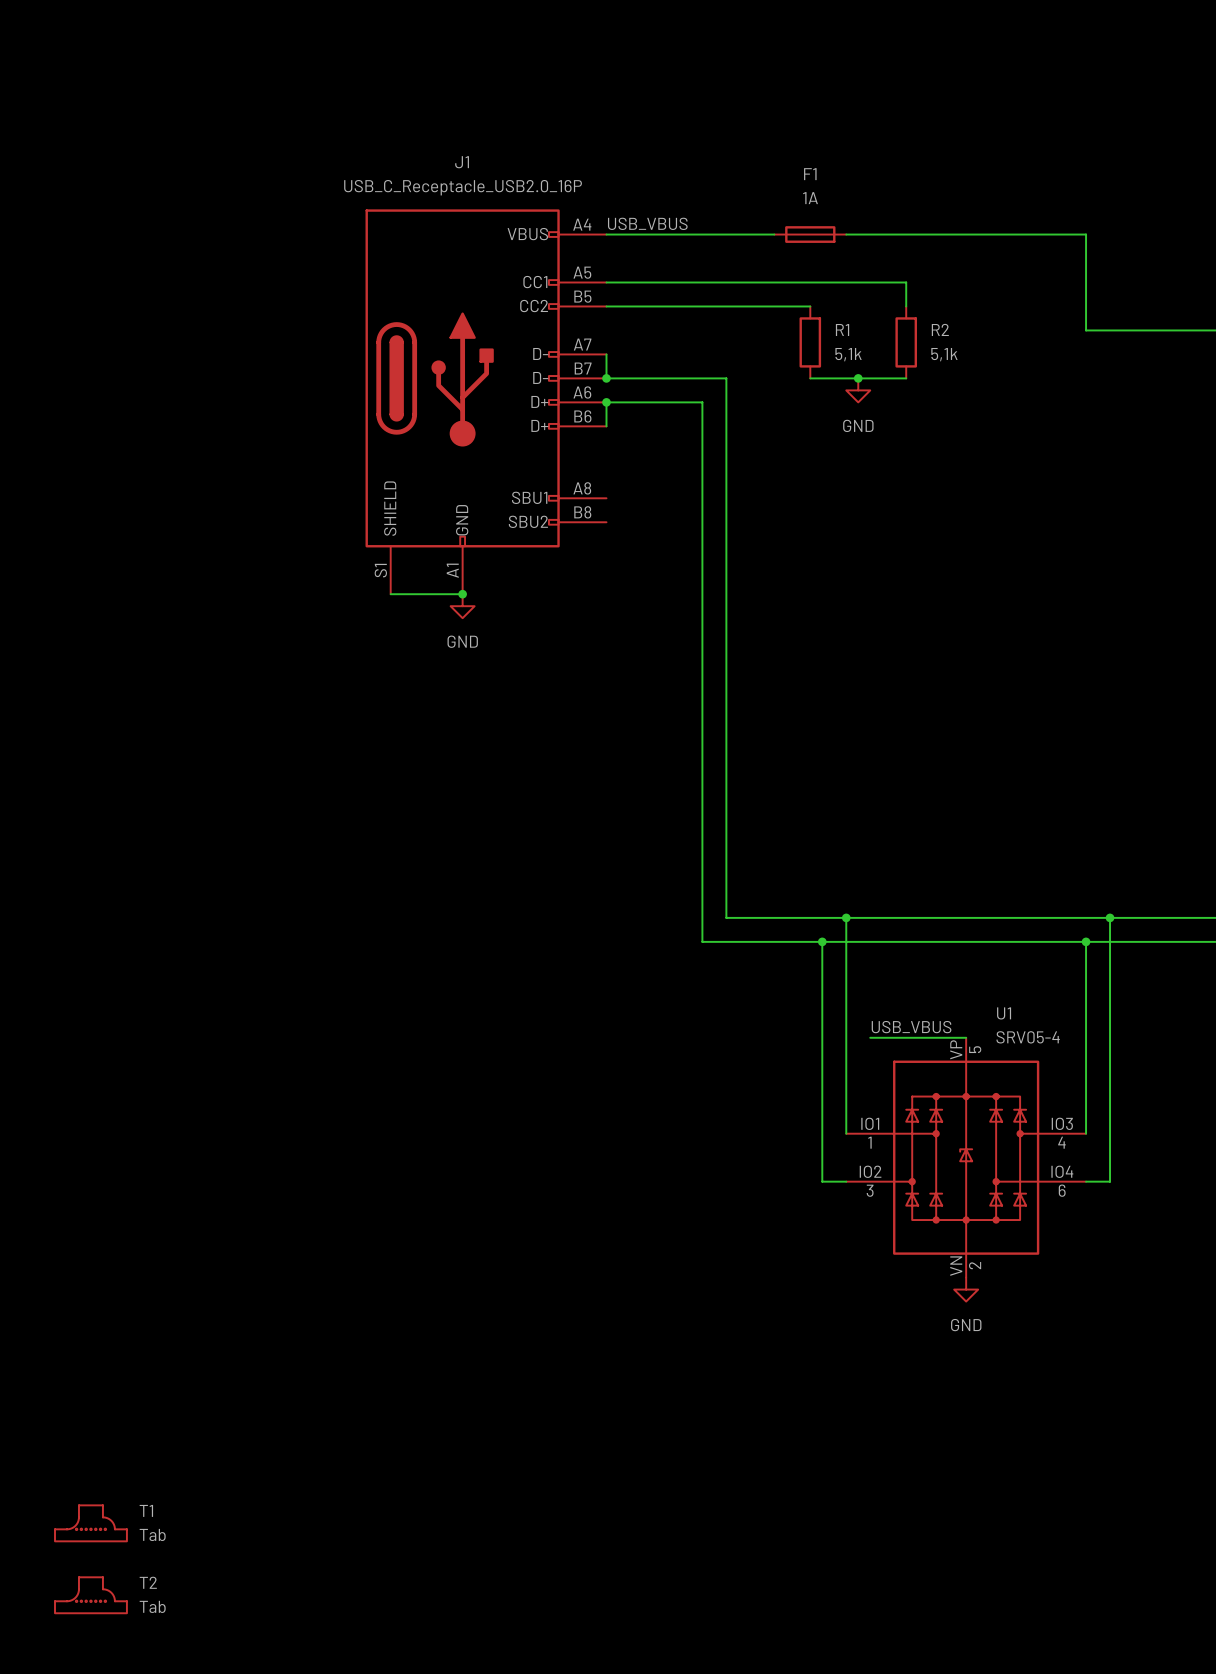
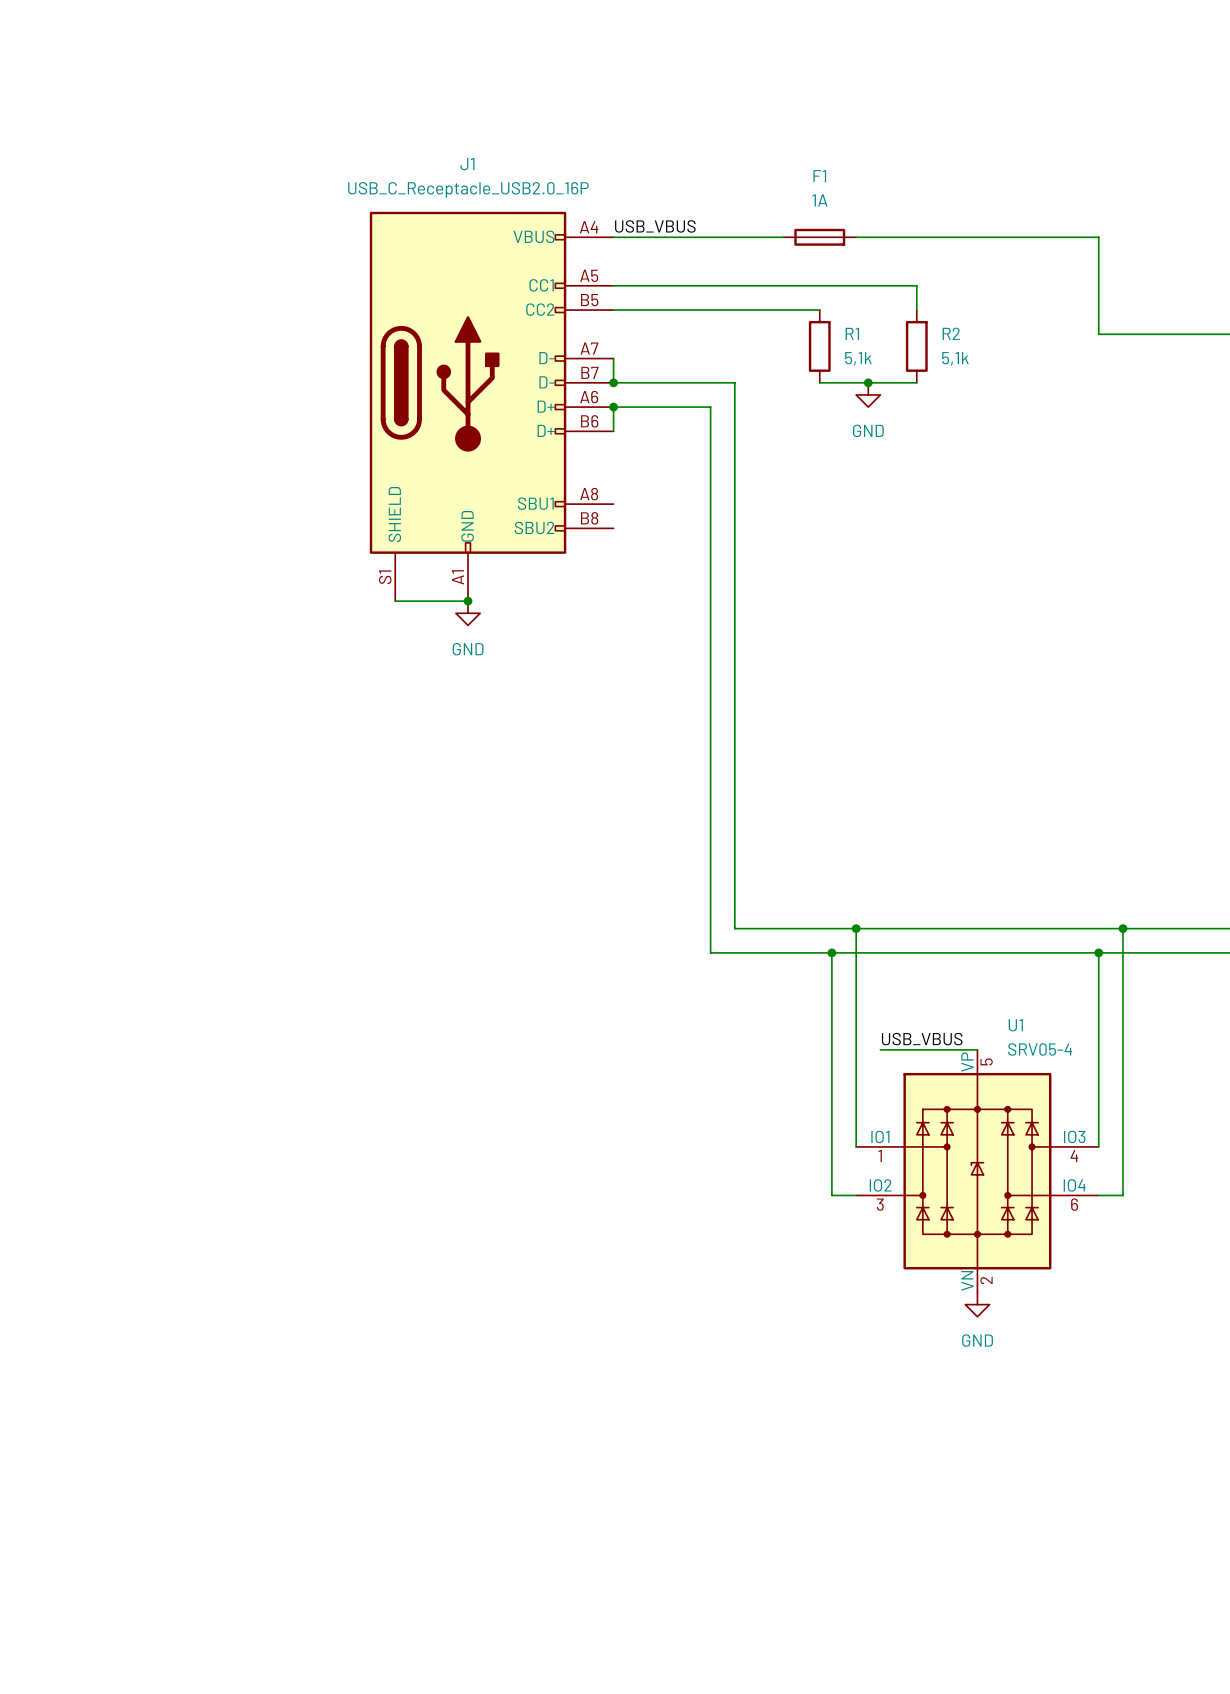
T1: Tab (90, 1523) -> none
T2: Tab (90, 1595) -> none

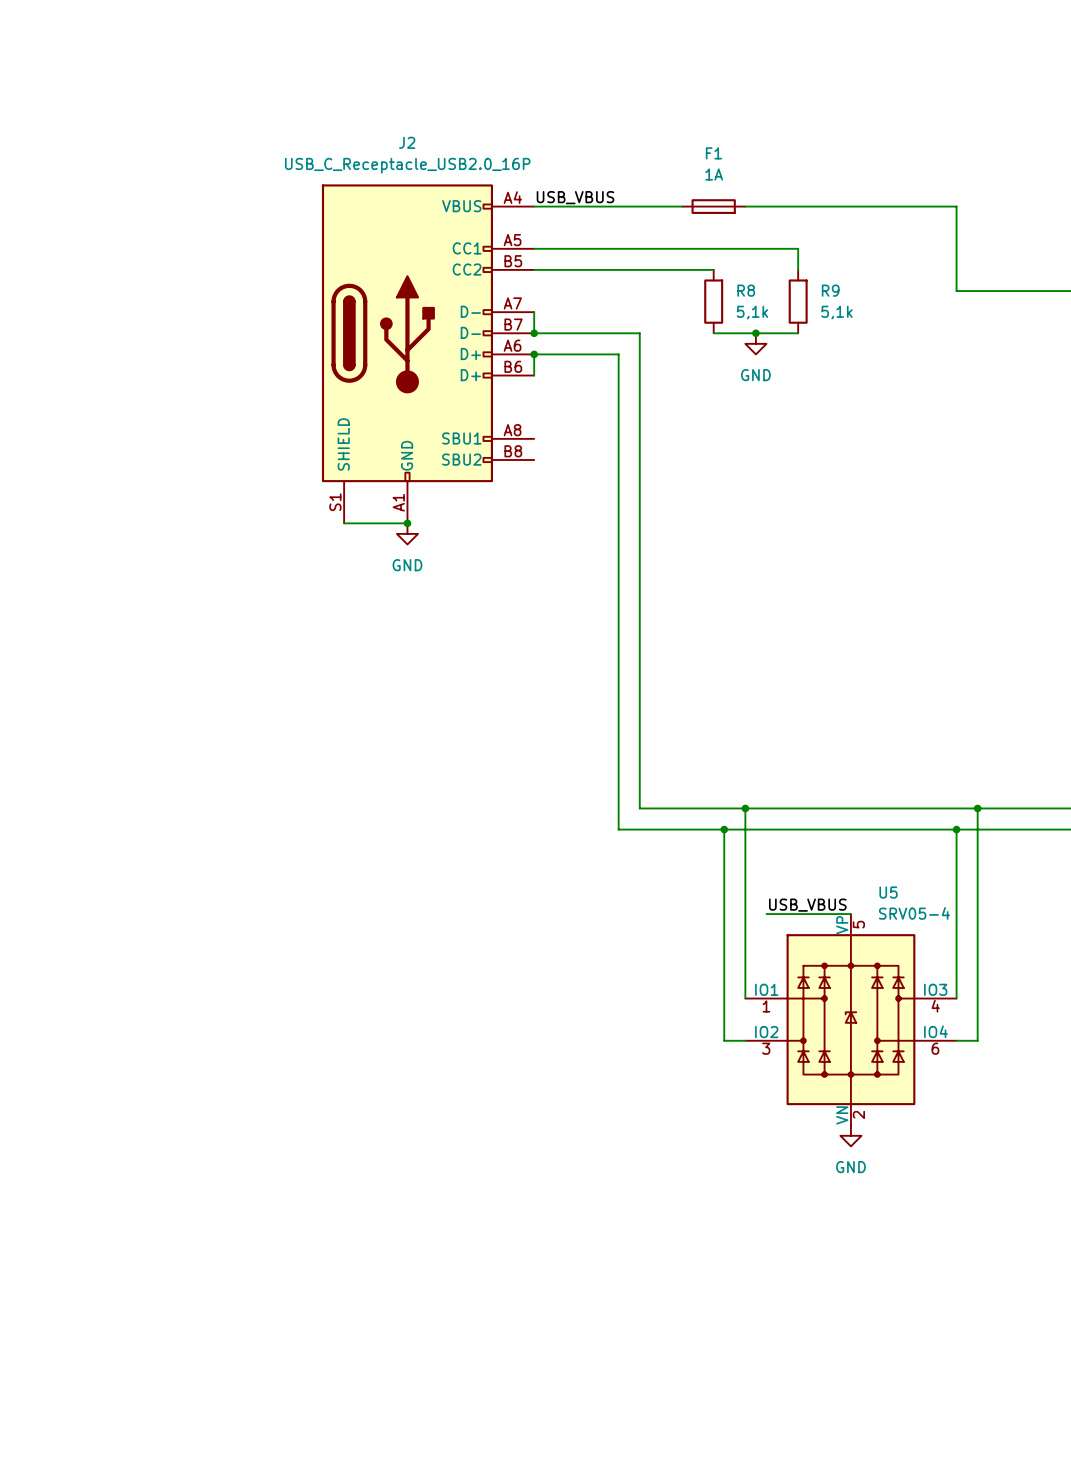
J1 name: J1 (467, 164) -> J2 (407, 142)
R1 name: R1 (852, 333) -> R8 (746, 290)
R2 name: R2 (951, 333) -> R9 (830, 290)
U1 name: U1 (1015, 1025) -> U5 (888, 892)

